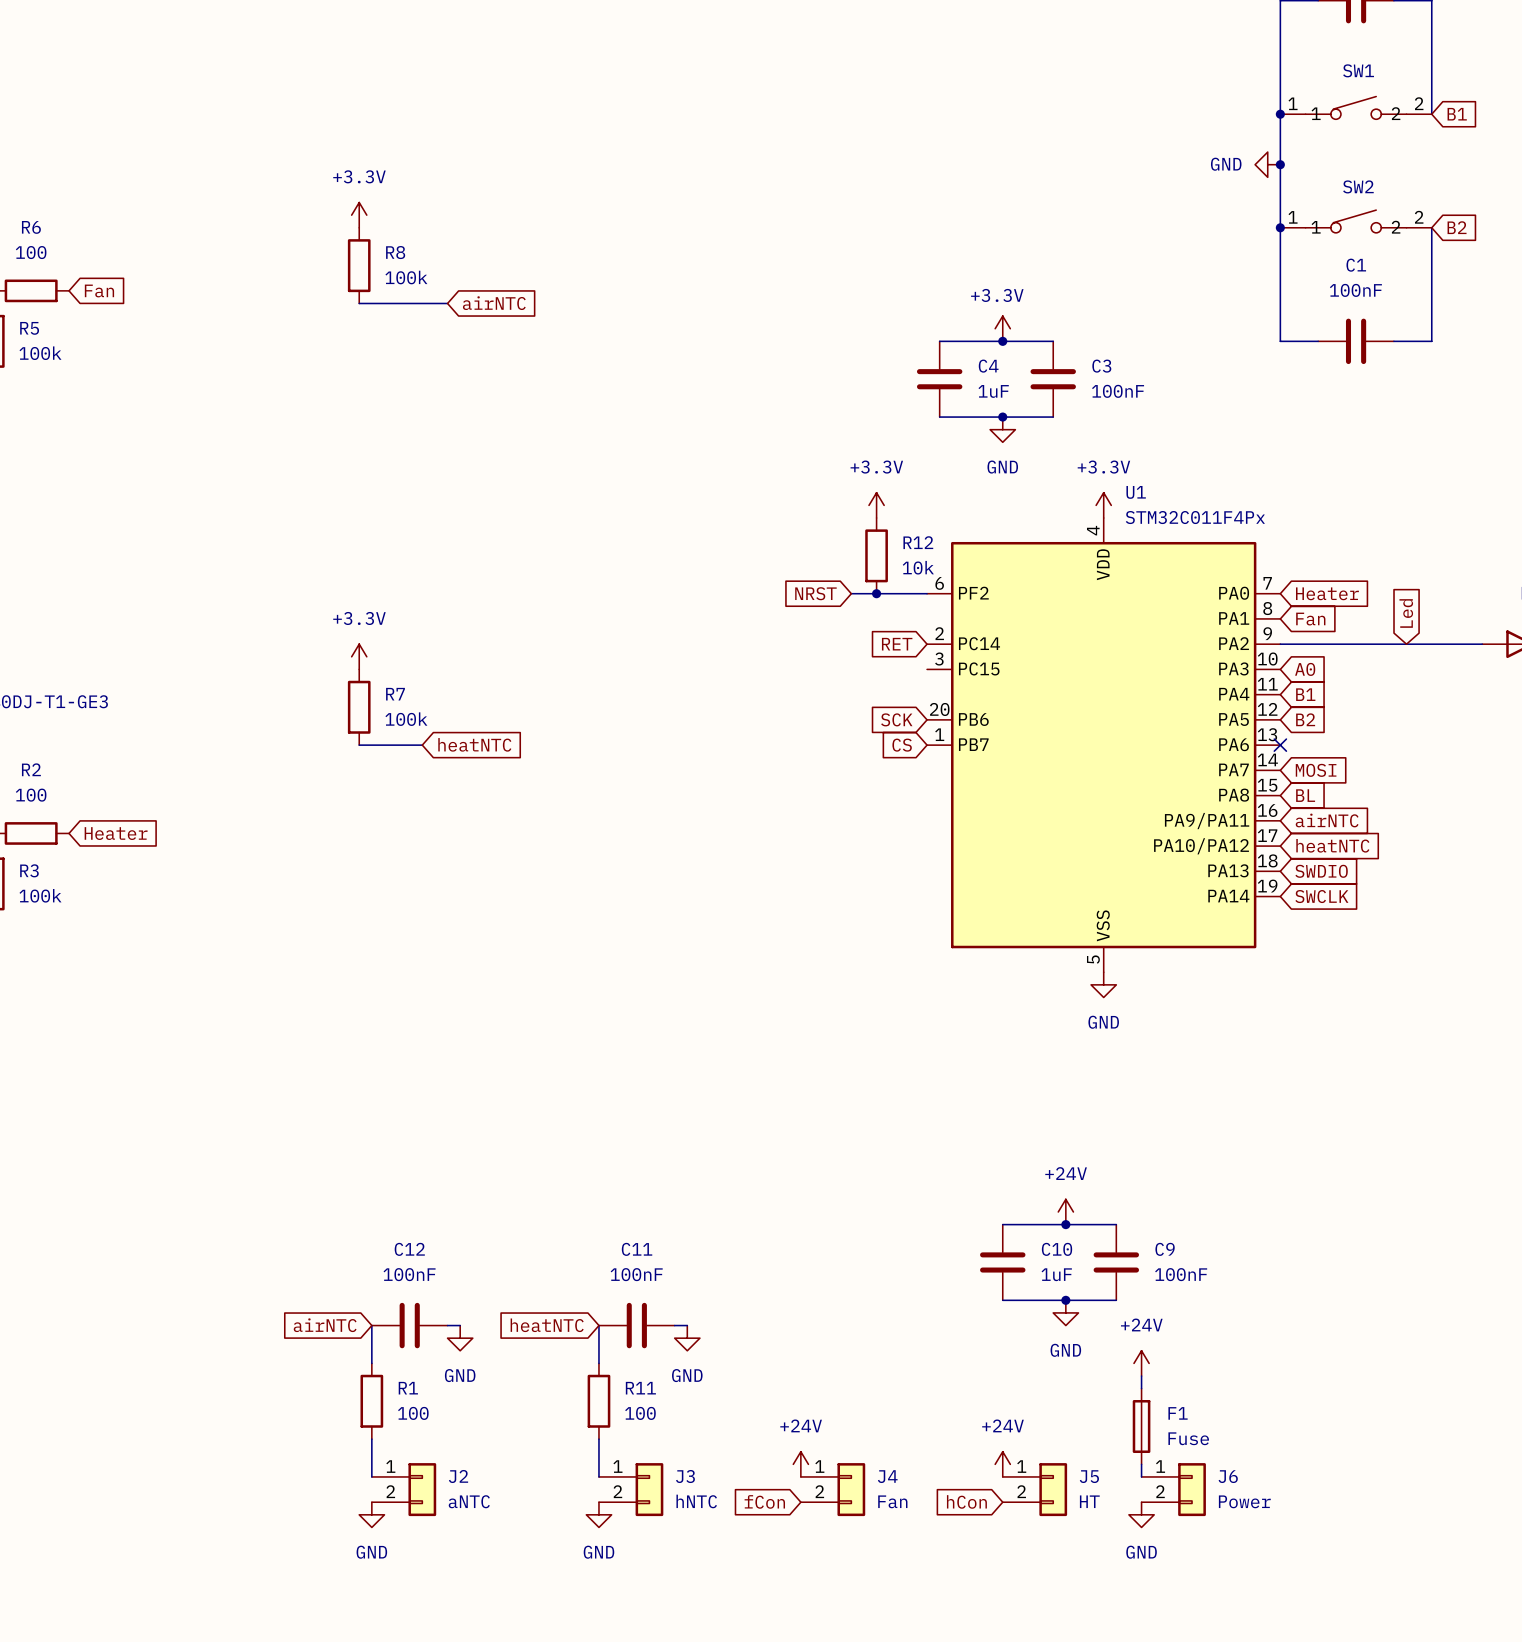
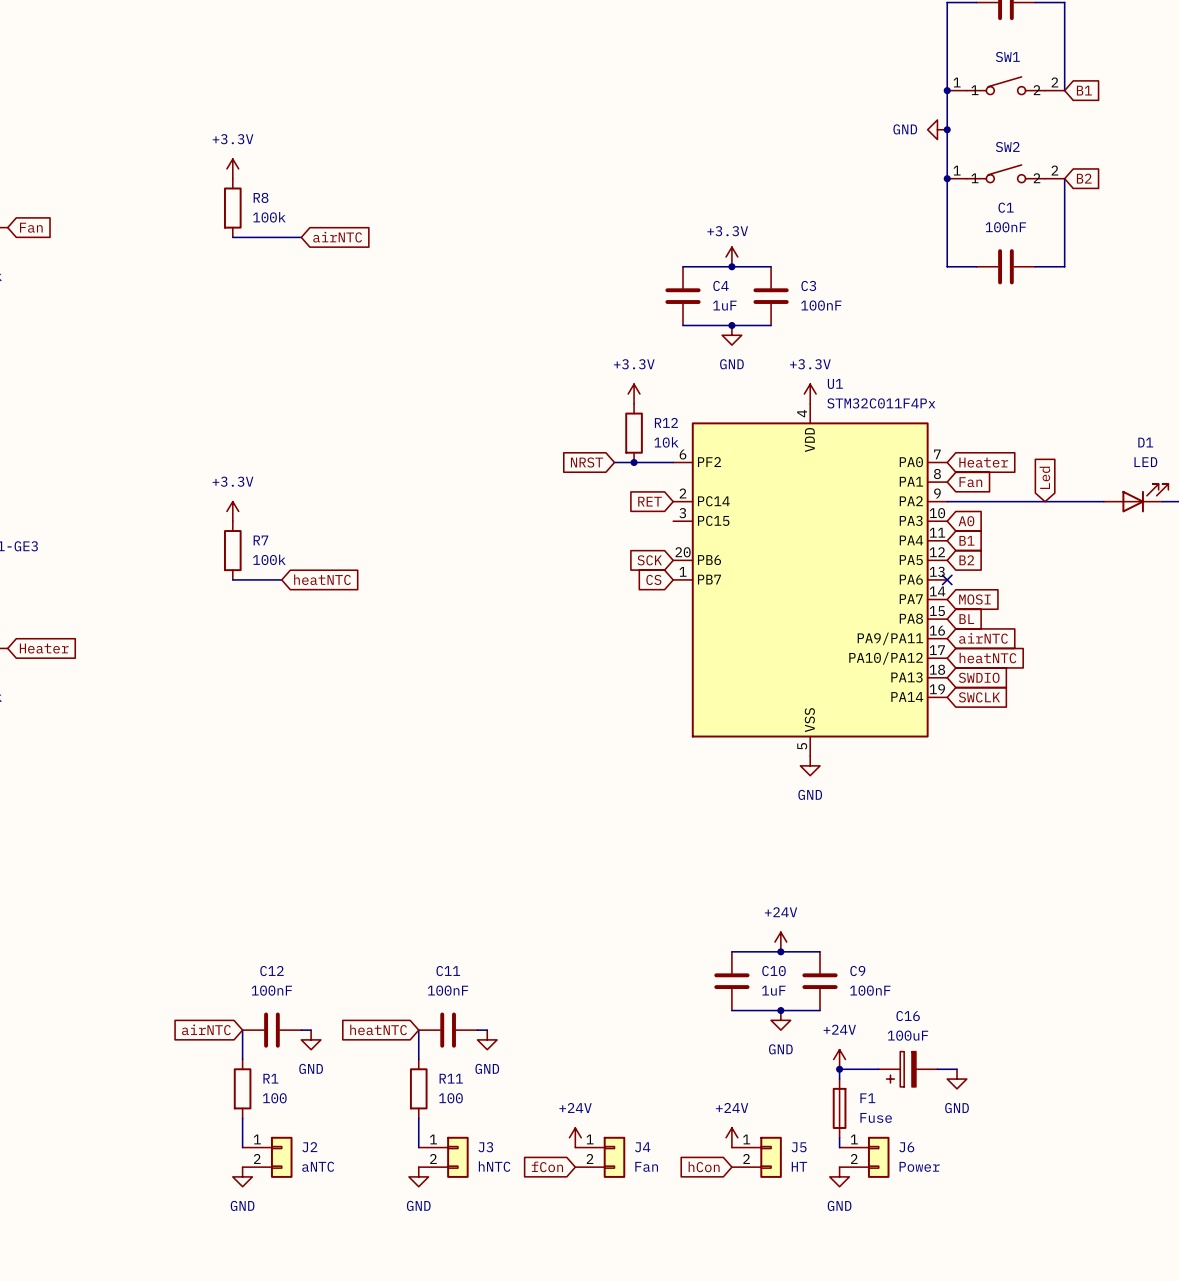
wire: none -> (839, 1069) (878, 1069)
junction: none -> (839, 1069)
C16: none -> 100uF (908, 1069)
wire: none -> (937, 1069) (957, 1069)
power symbol: none -> GND (957, 1079)

